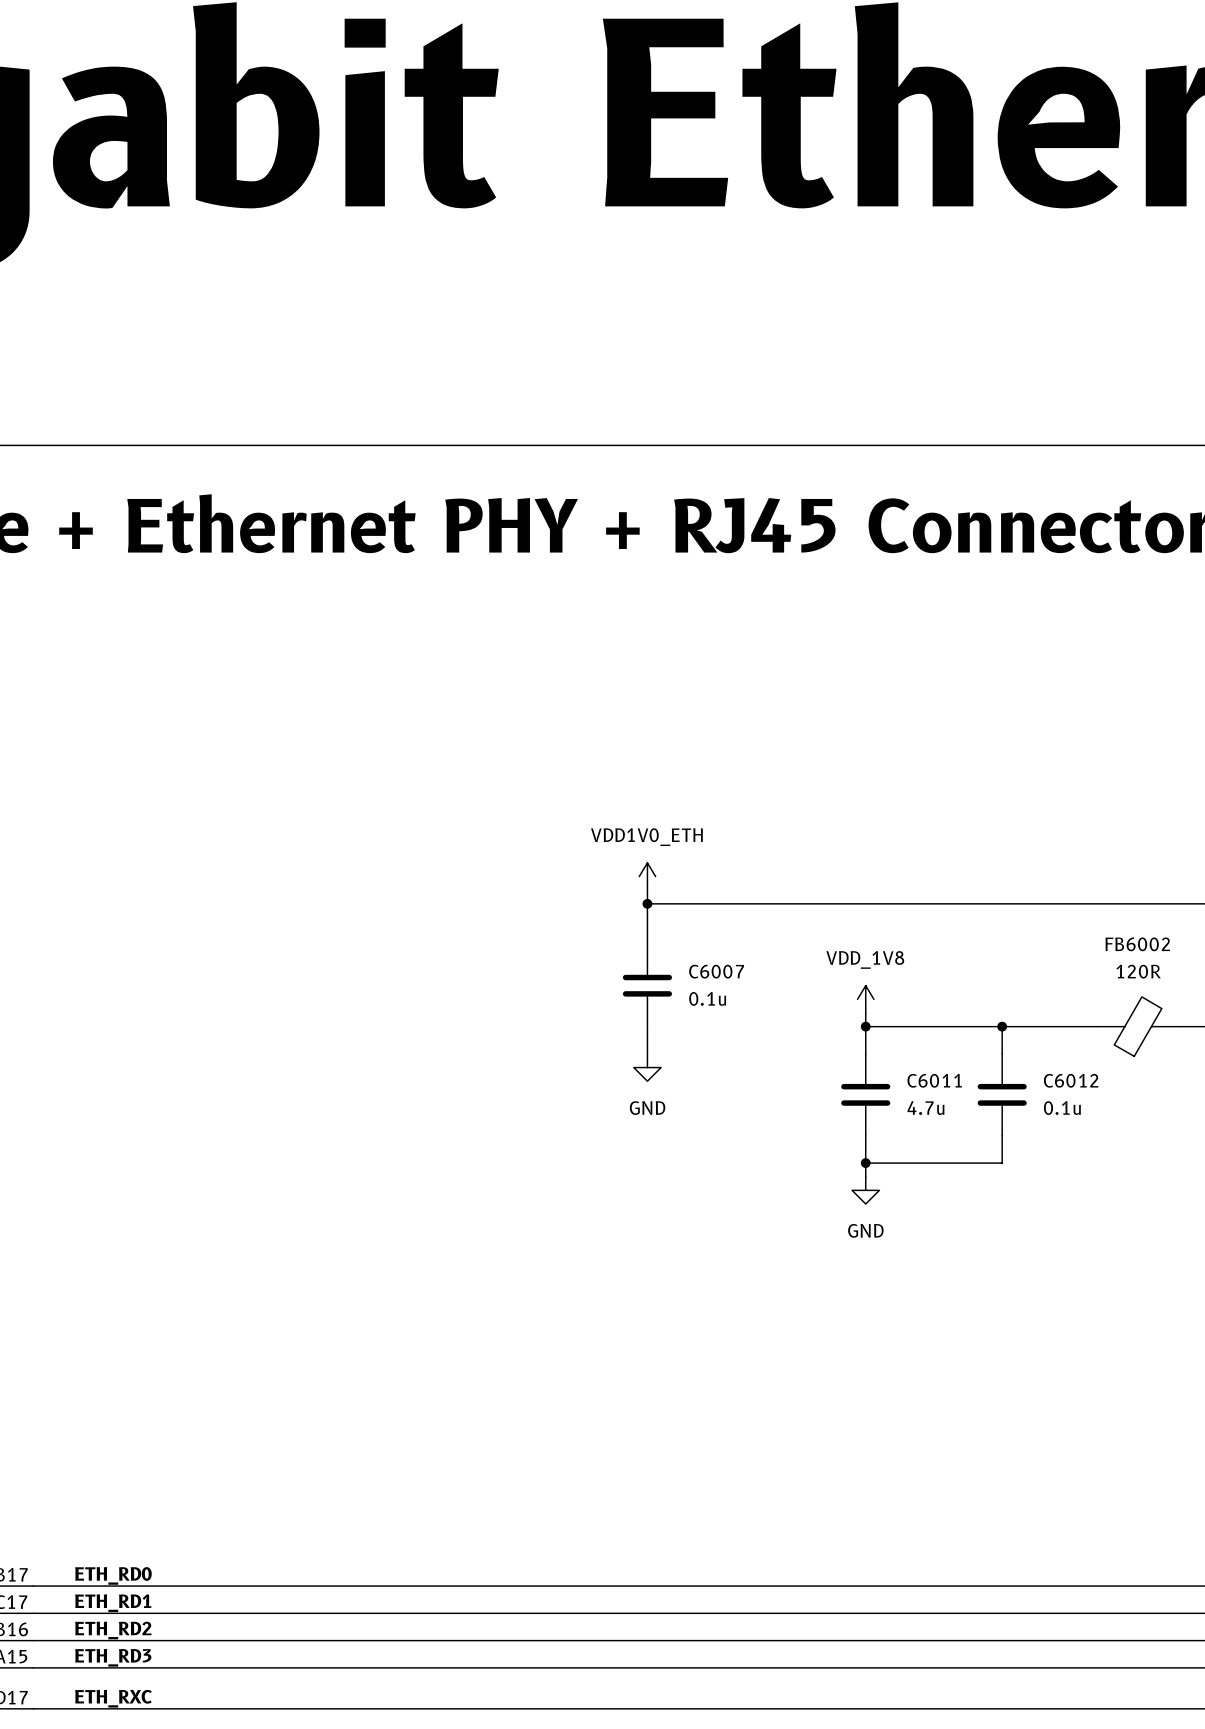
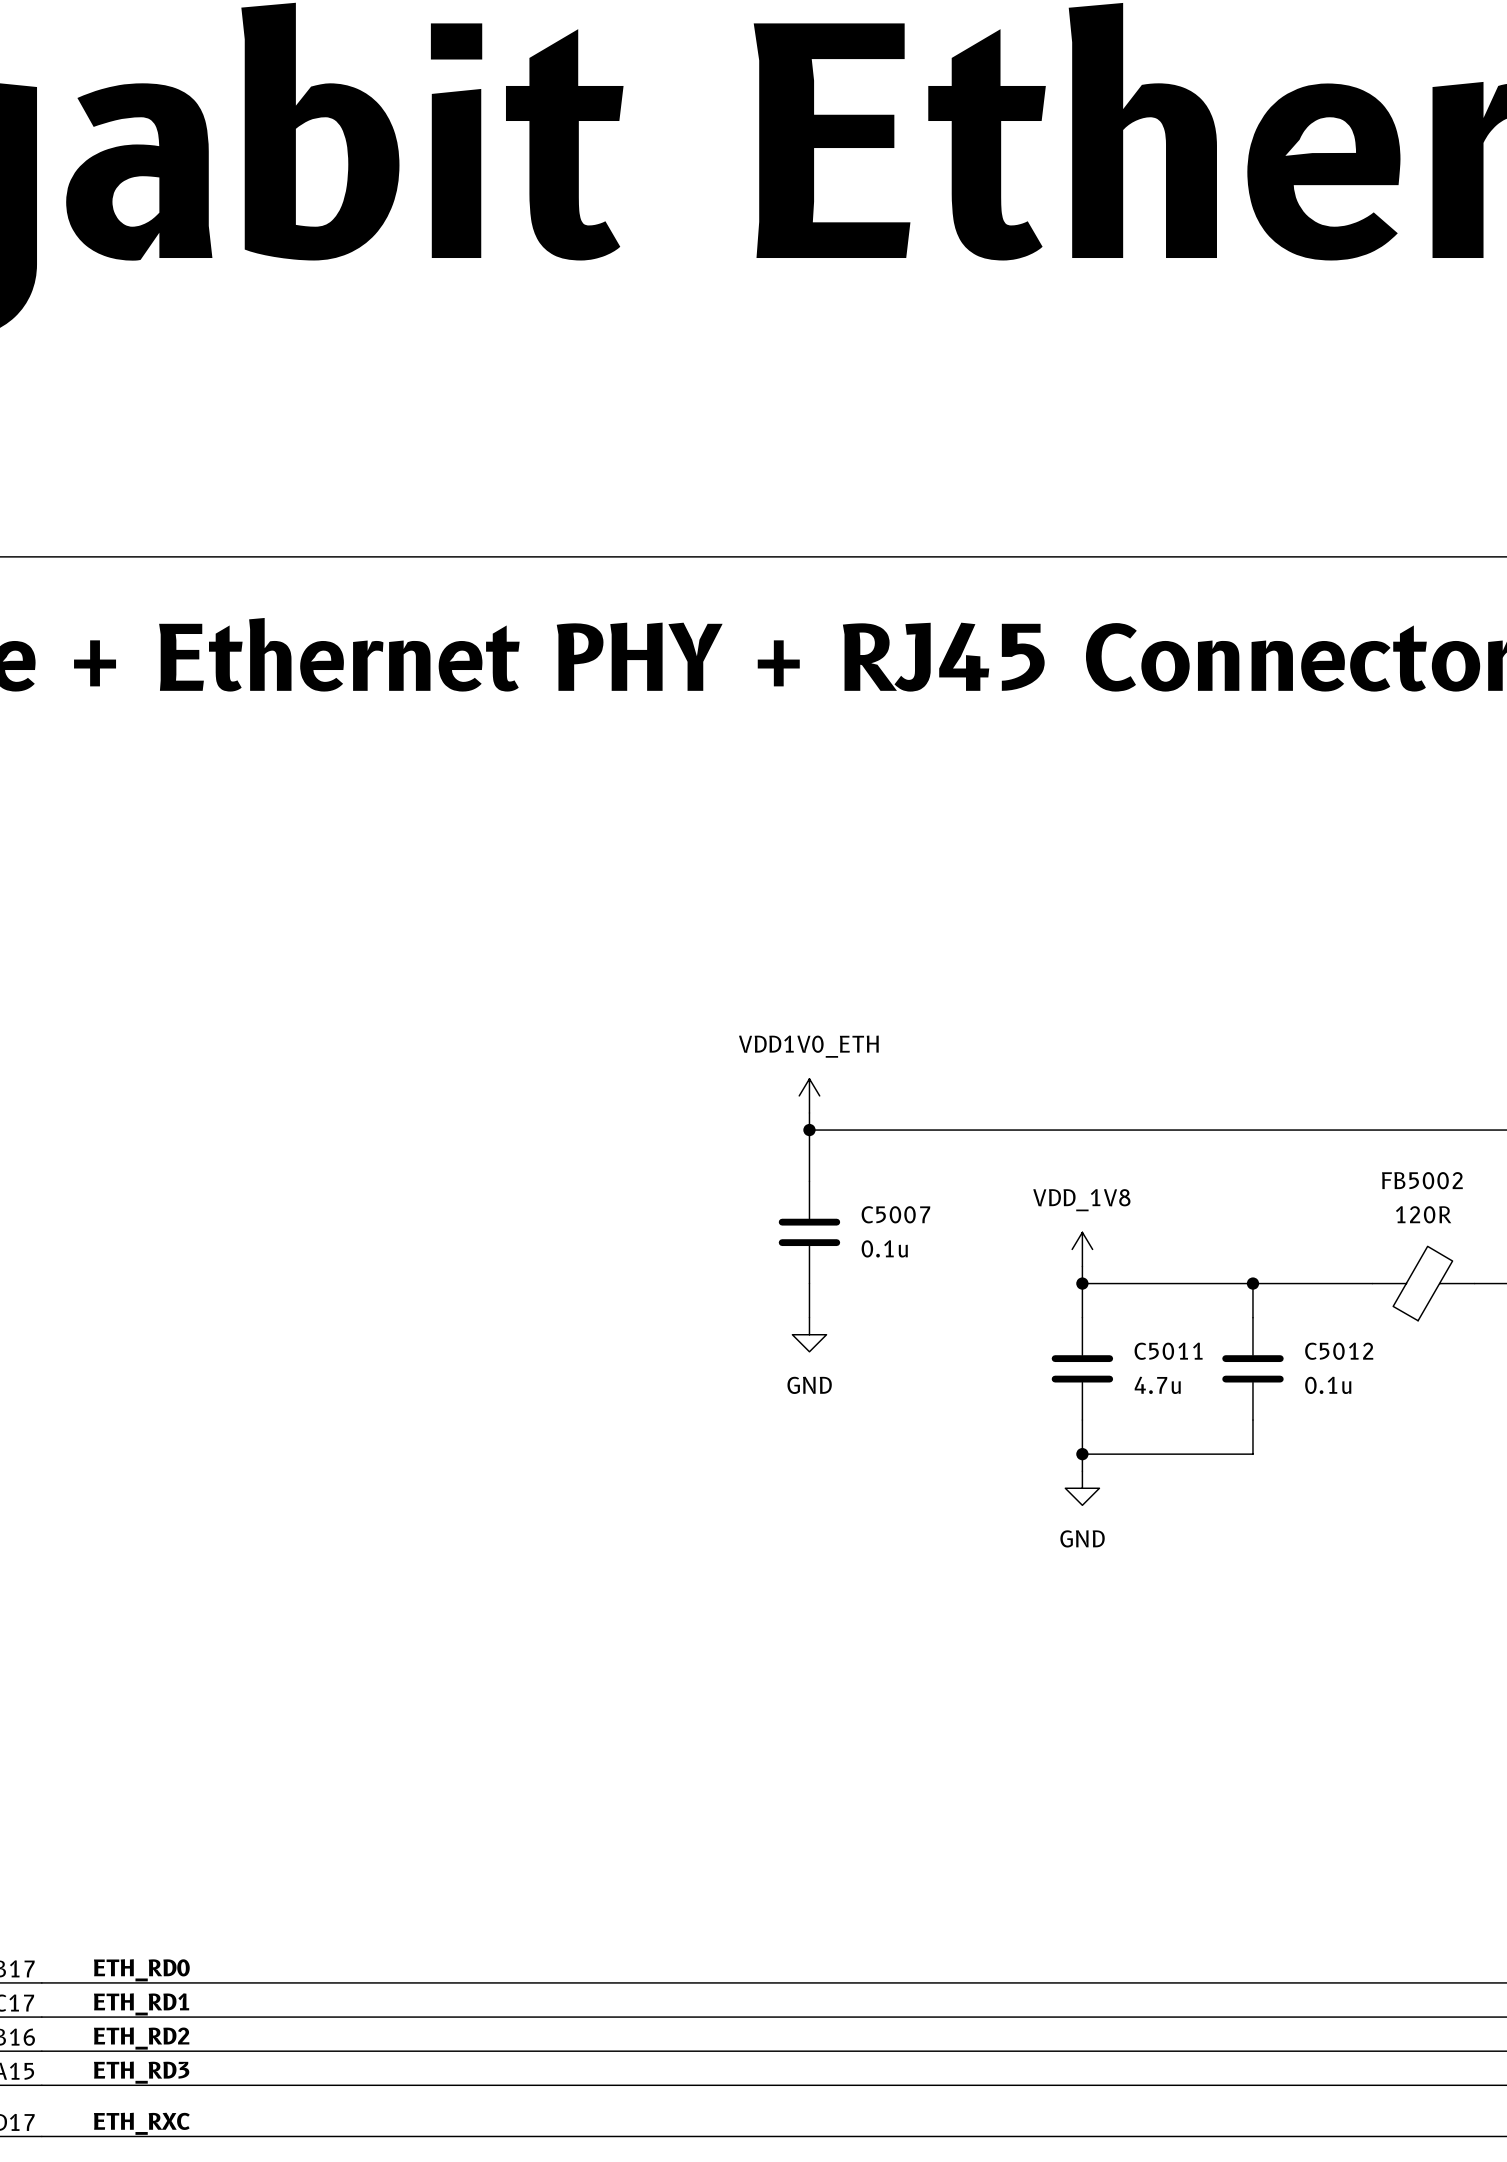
FB6002 name: FB6002 (1137, 944) -> FB5002 (1422, 1180)
C6007 name: C6007 (716, 971) -> C5007 (895, 1214)
C6011 name: C6011 (934, 1080) -> C5011 (1168, 1351)
C6012 name: C6012 (1071, 1080) -> C5012 (1339, 1351)

